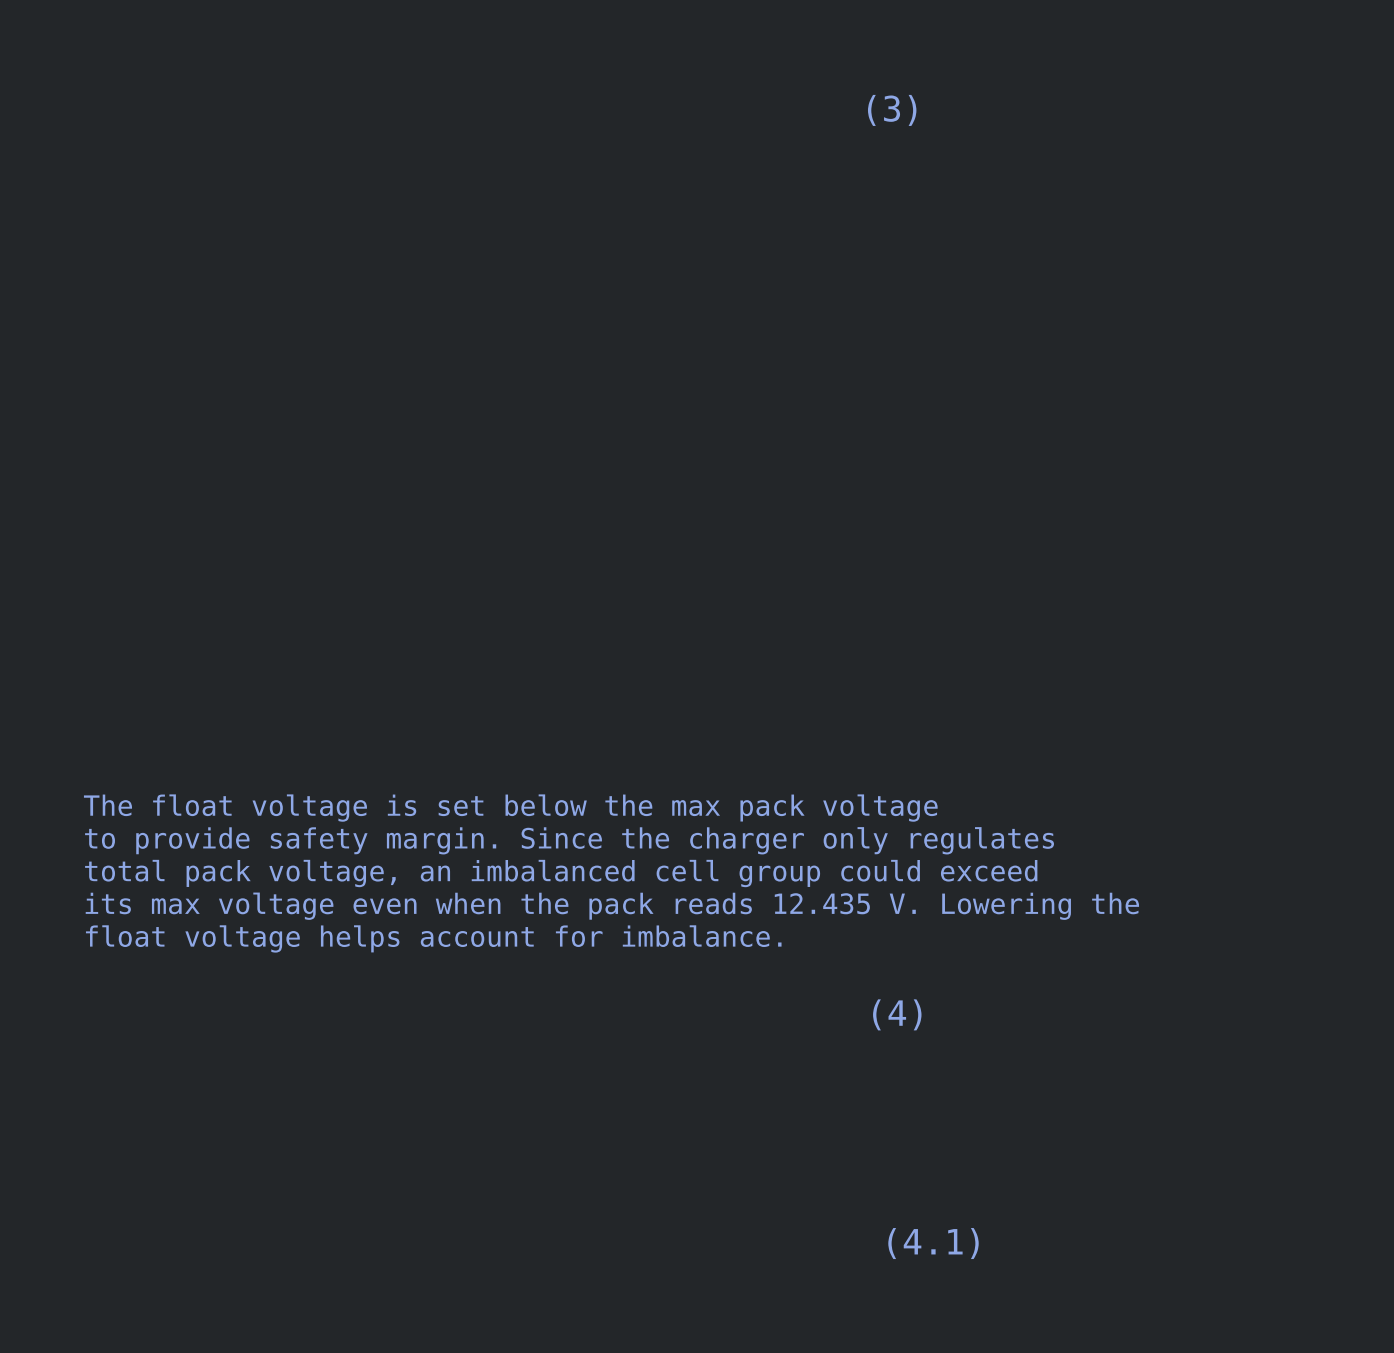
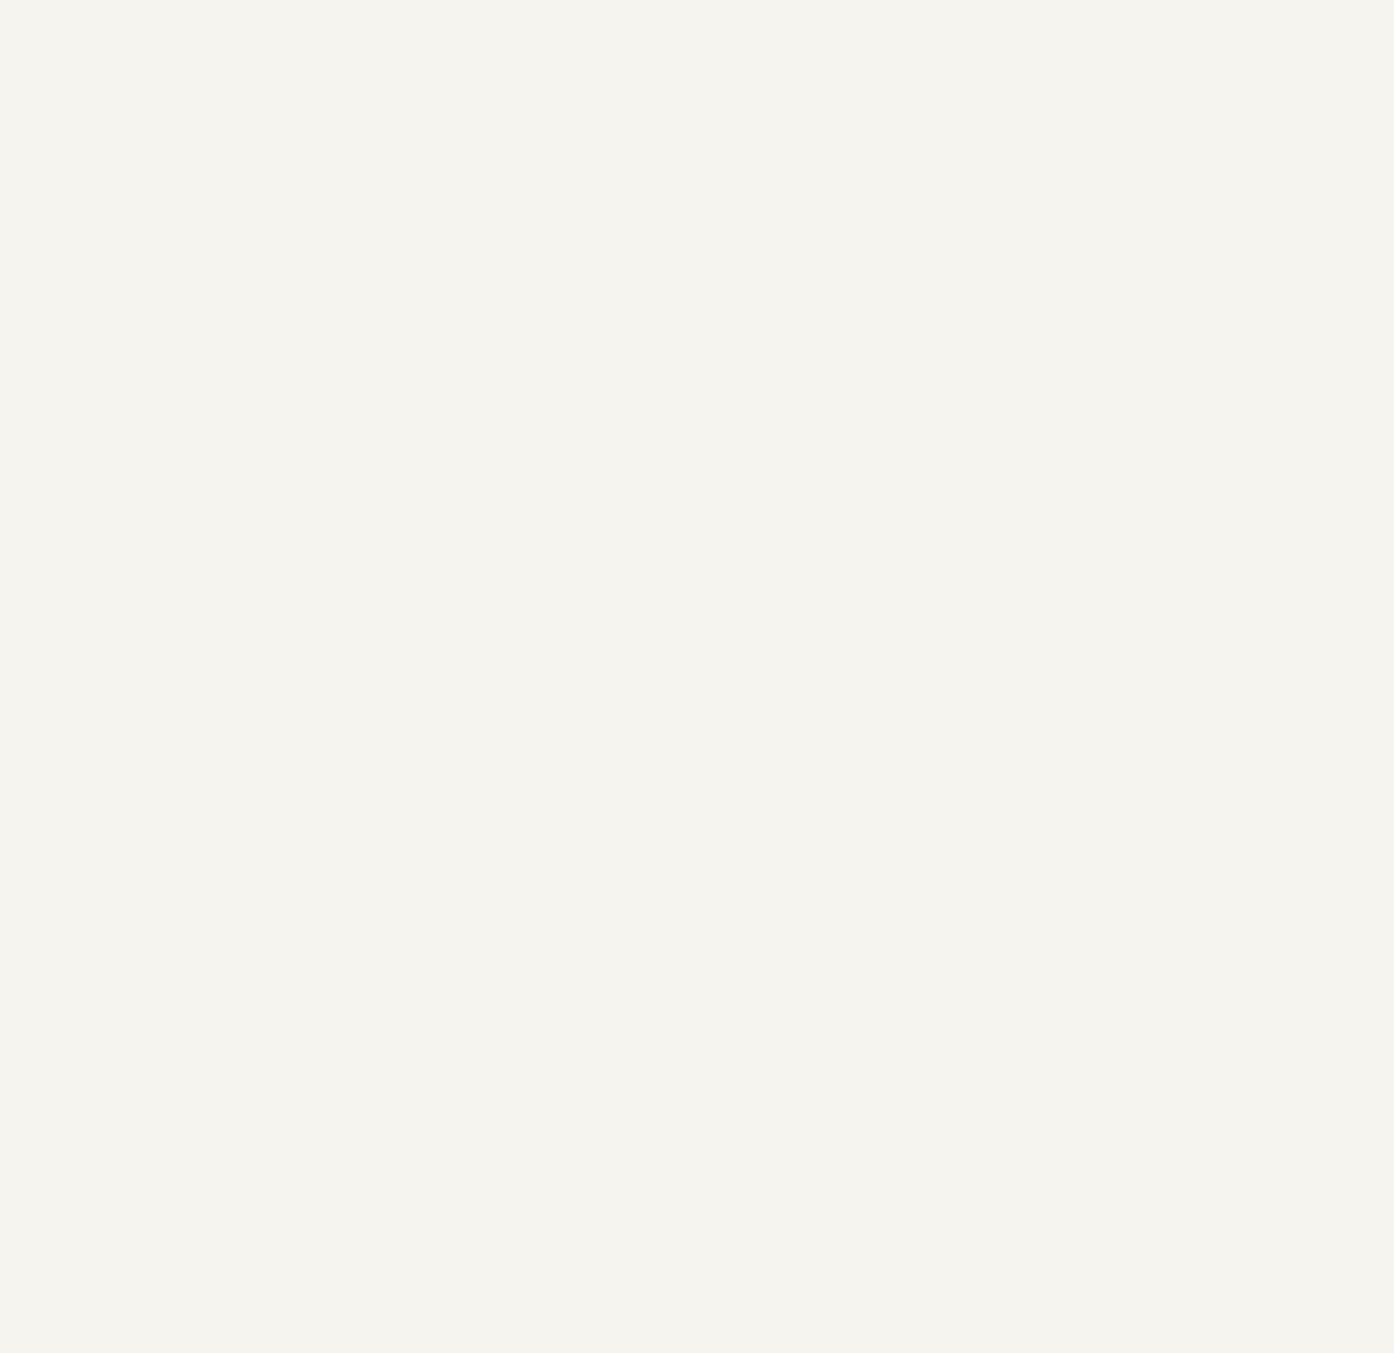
text: (3) (892, 110) -> none
text: The float voltage is set below the max pack voltage (510, 808) -> none
text: to provide safety margin. Since the charger only regulates (569, 840) -> none
text: total pack voltage, an imbalanced cell group could exceed (561, 873) -> none
text: its max voltage even when the pack reads 12.435 V. Lowering the (612, 906) -> none
text: float voltage helps account for imbalance. (433, 938) -> none
text: (4) (897, 1014) -> none
text: (4.1) (933, 1243) -> none

